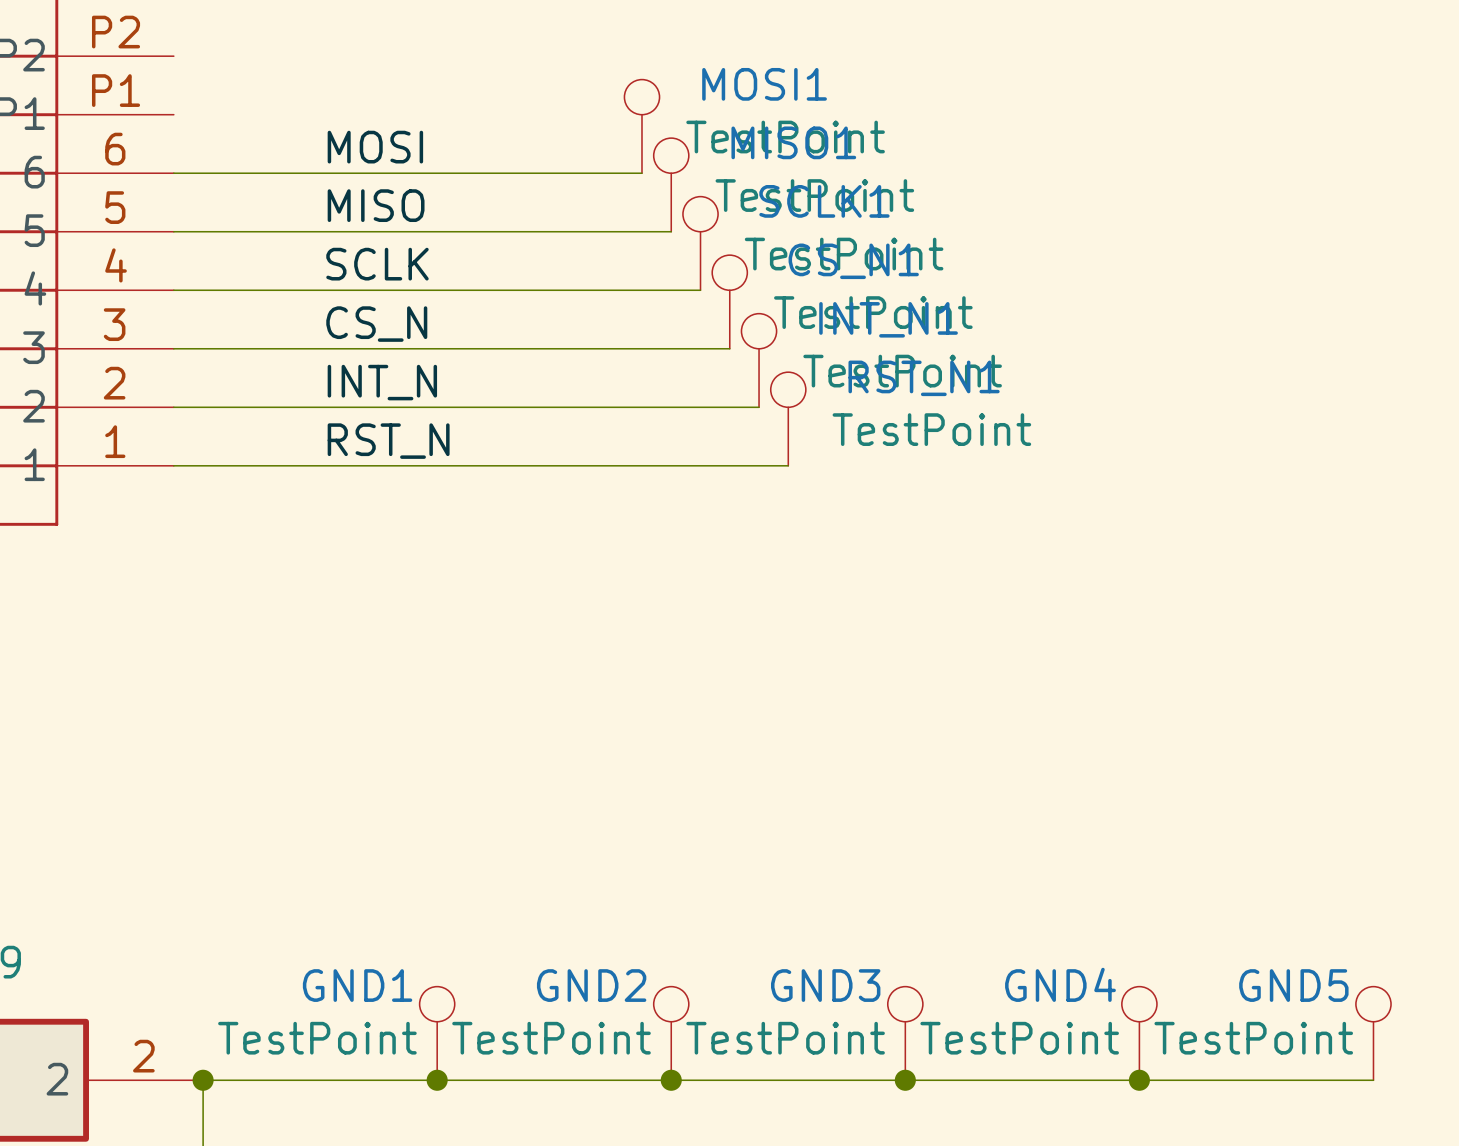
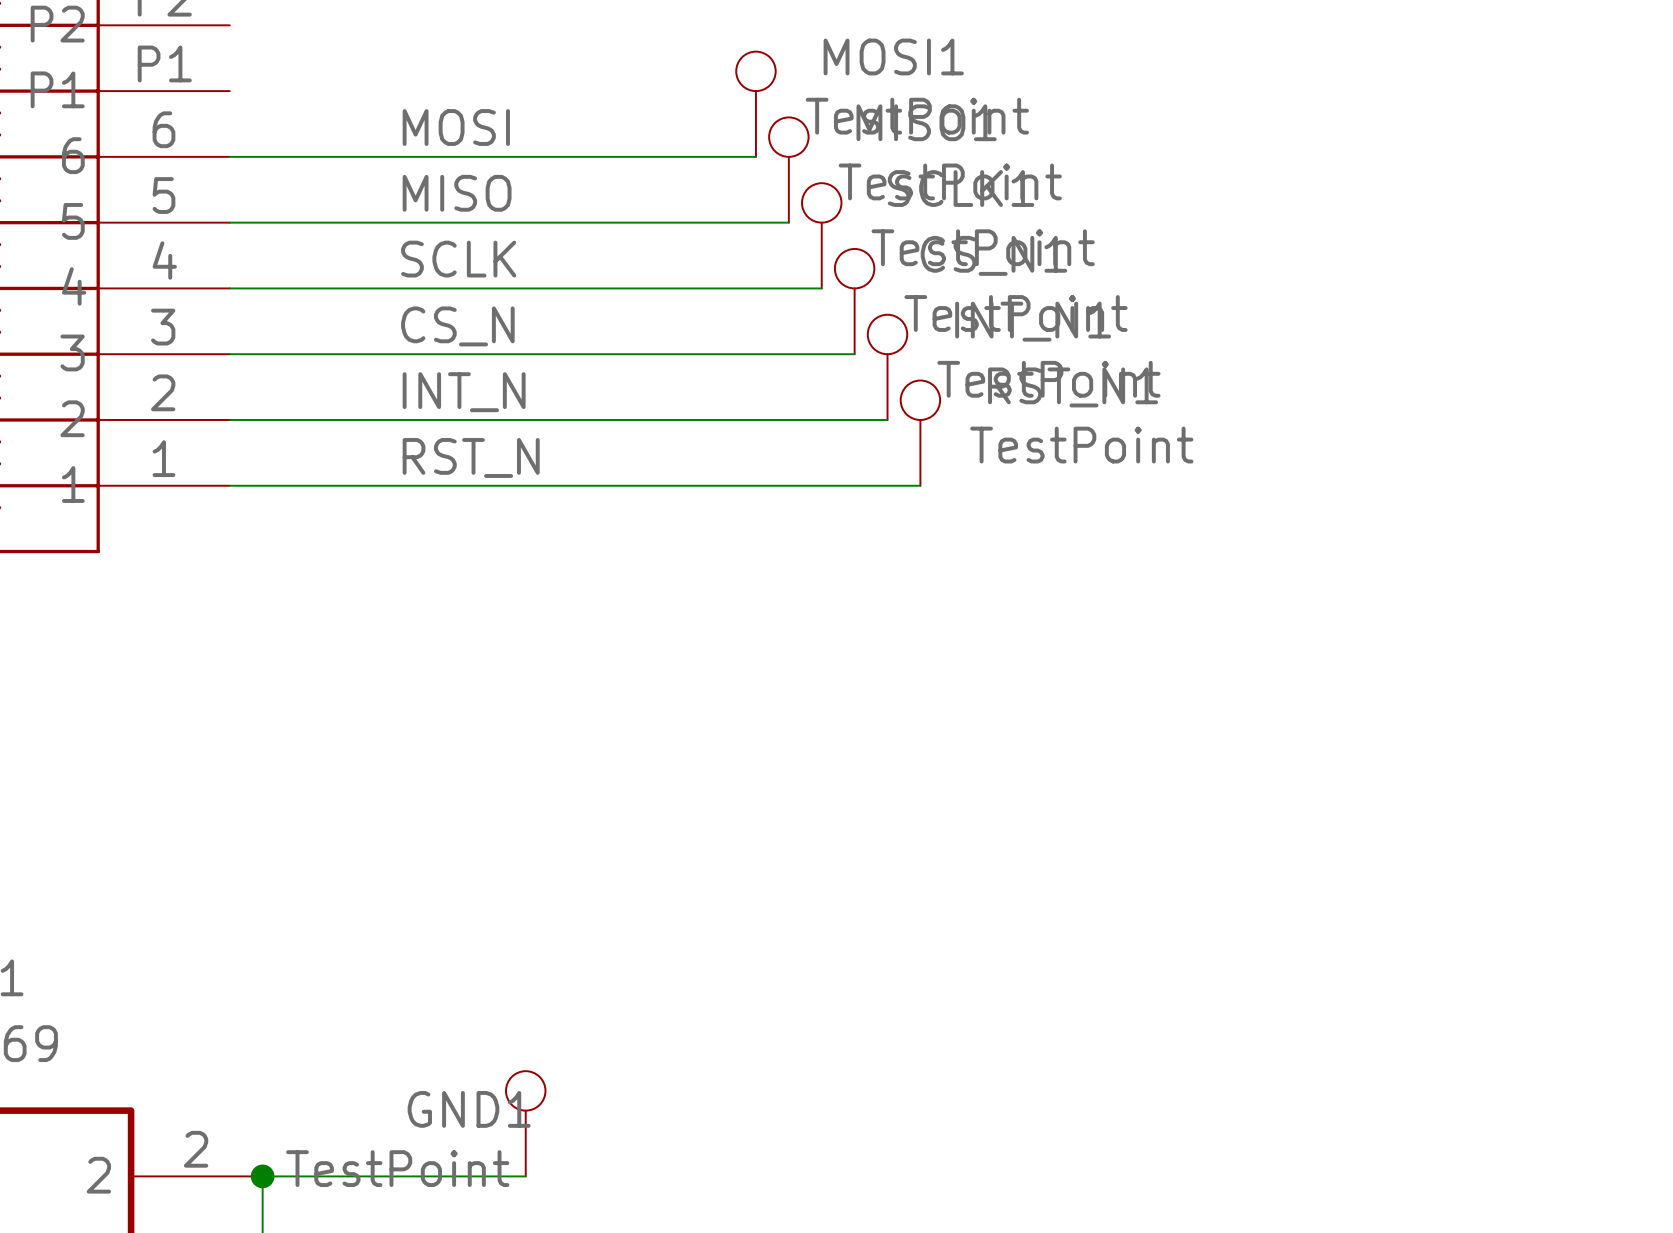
GND1 name position: GND1 (357, 985) -> GND1 (469, 1109)
GND2: TestPoint (671, 1033) -> none
GND3: TestPoint (905, 1033) -> none
GND4: TestPoint (1139, 1033) -> none
GND5: TestPoint (1373, 1033) -> none
GND1 value position: TestPoint (317, 1038) -> TestPoint (397, 1168)
wire: (437, 1080) (1373, 1080) -> none
junction: (437, 1080) -> none
junction: (671, 1080) -> none
junction: (905, 1080) -> none
junction: (1139, 1080) -> none

